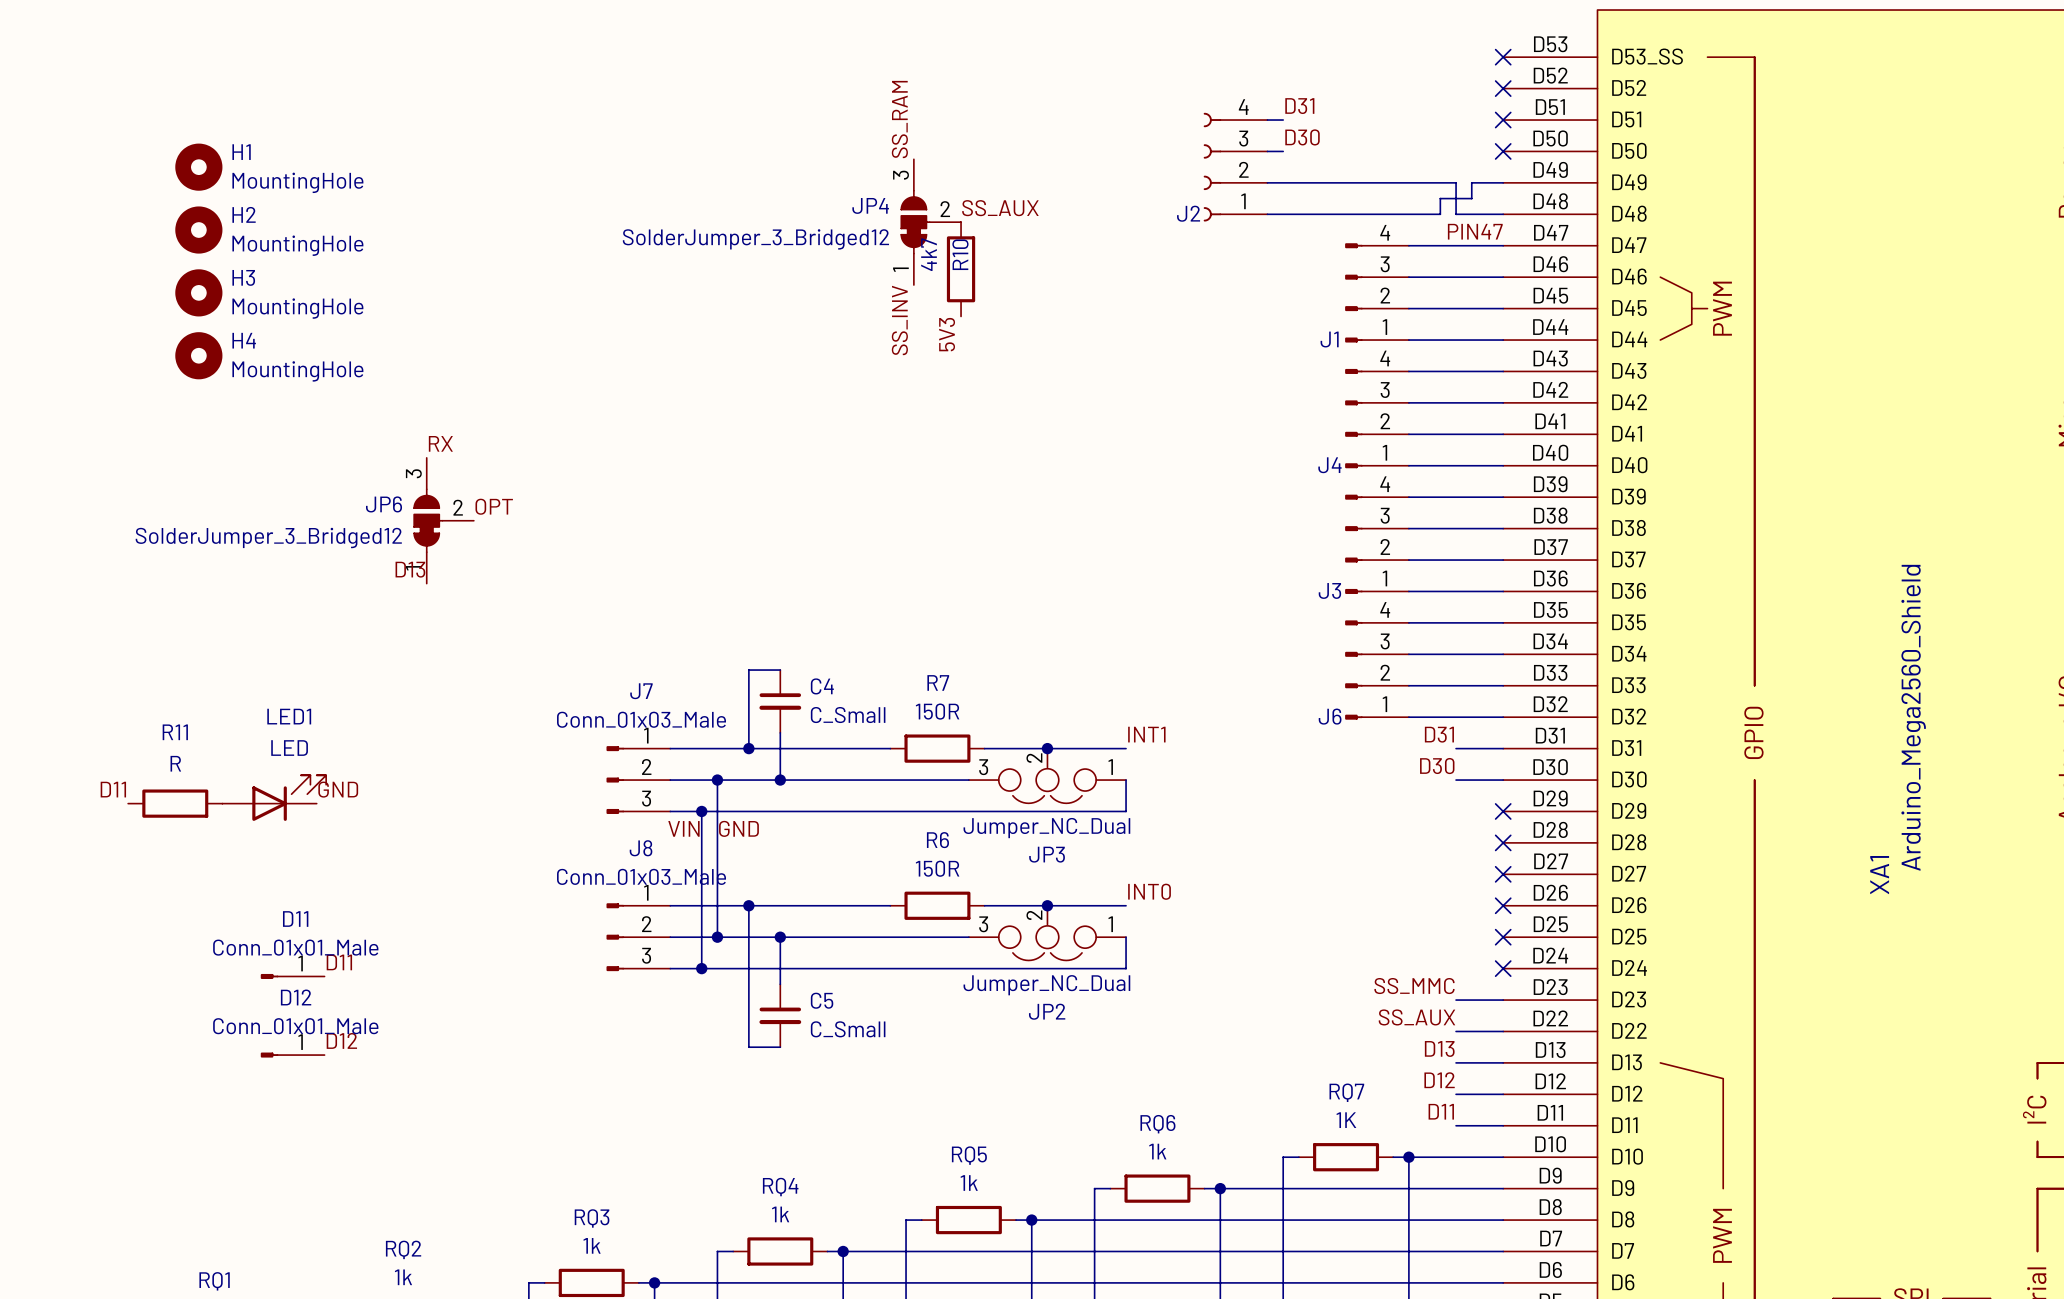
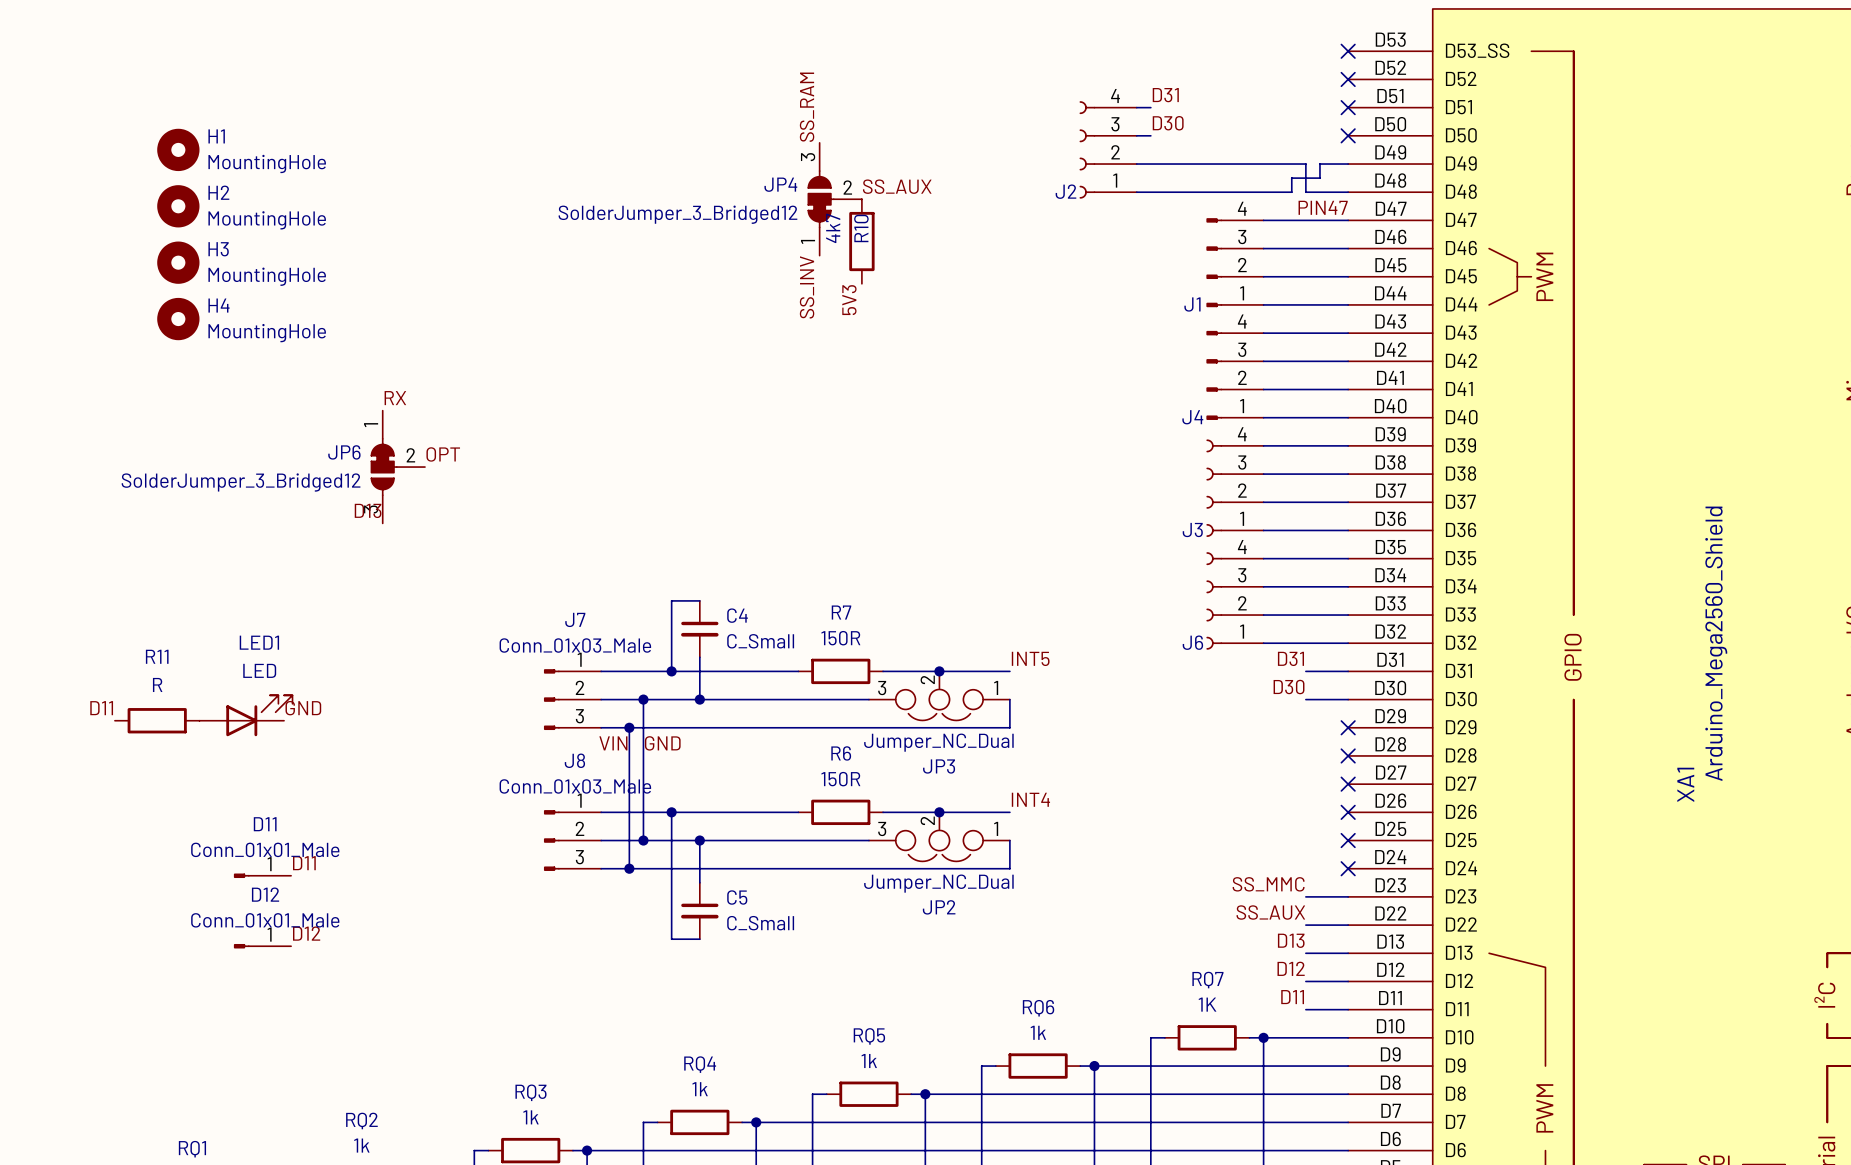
J3 symbol: [1345, 494, 1409, 594] -> [1206, 439, 1264, 537]
JP6 flip: as is (428, 520) -> up-down (384, 467)
J6 symbol: [1345, 620, 1409, 720] -> [1206, 552, 1264, 650]
label: INT1 (1146, 734) -> INT5 (1030, 658)
label: INT0 (1149, 891) -> INT4 (1030, 799)

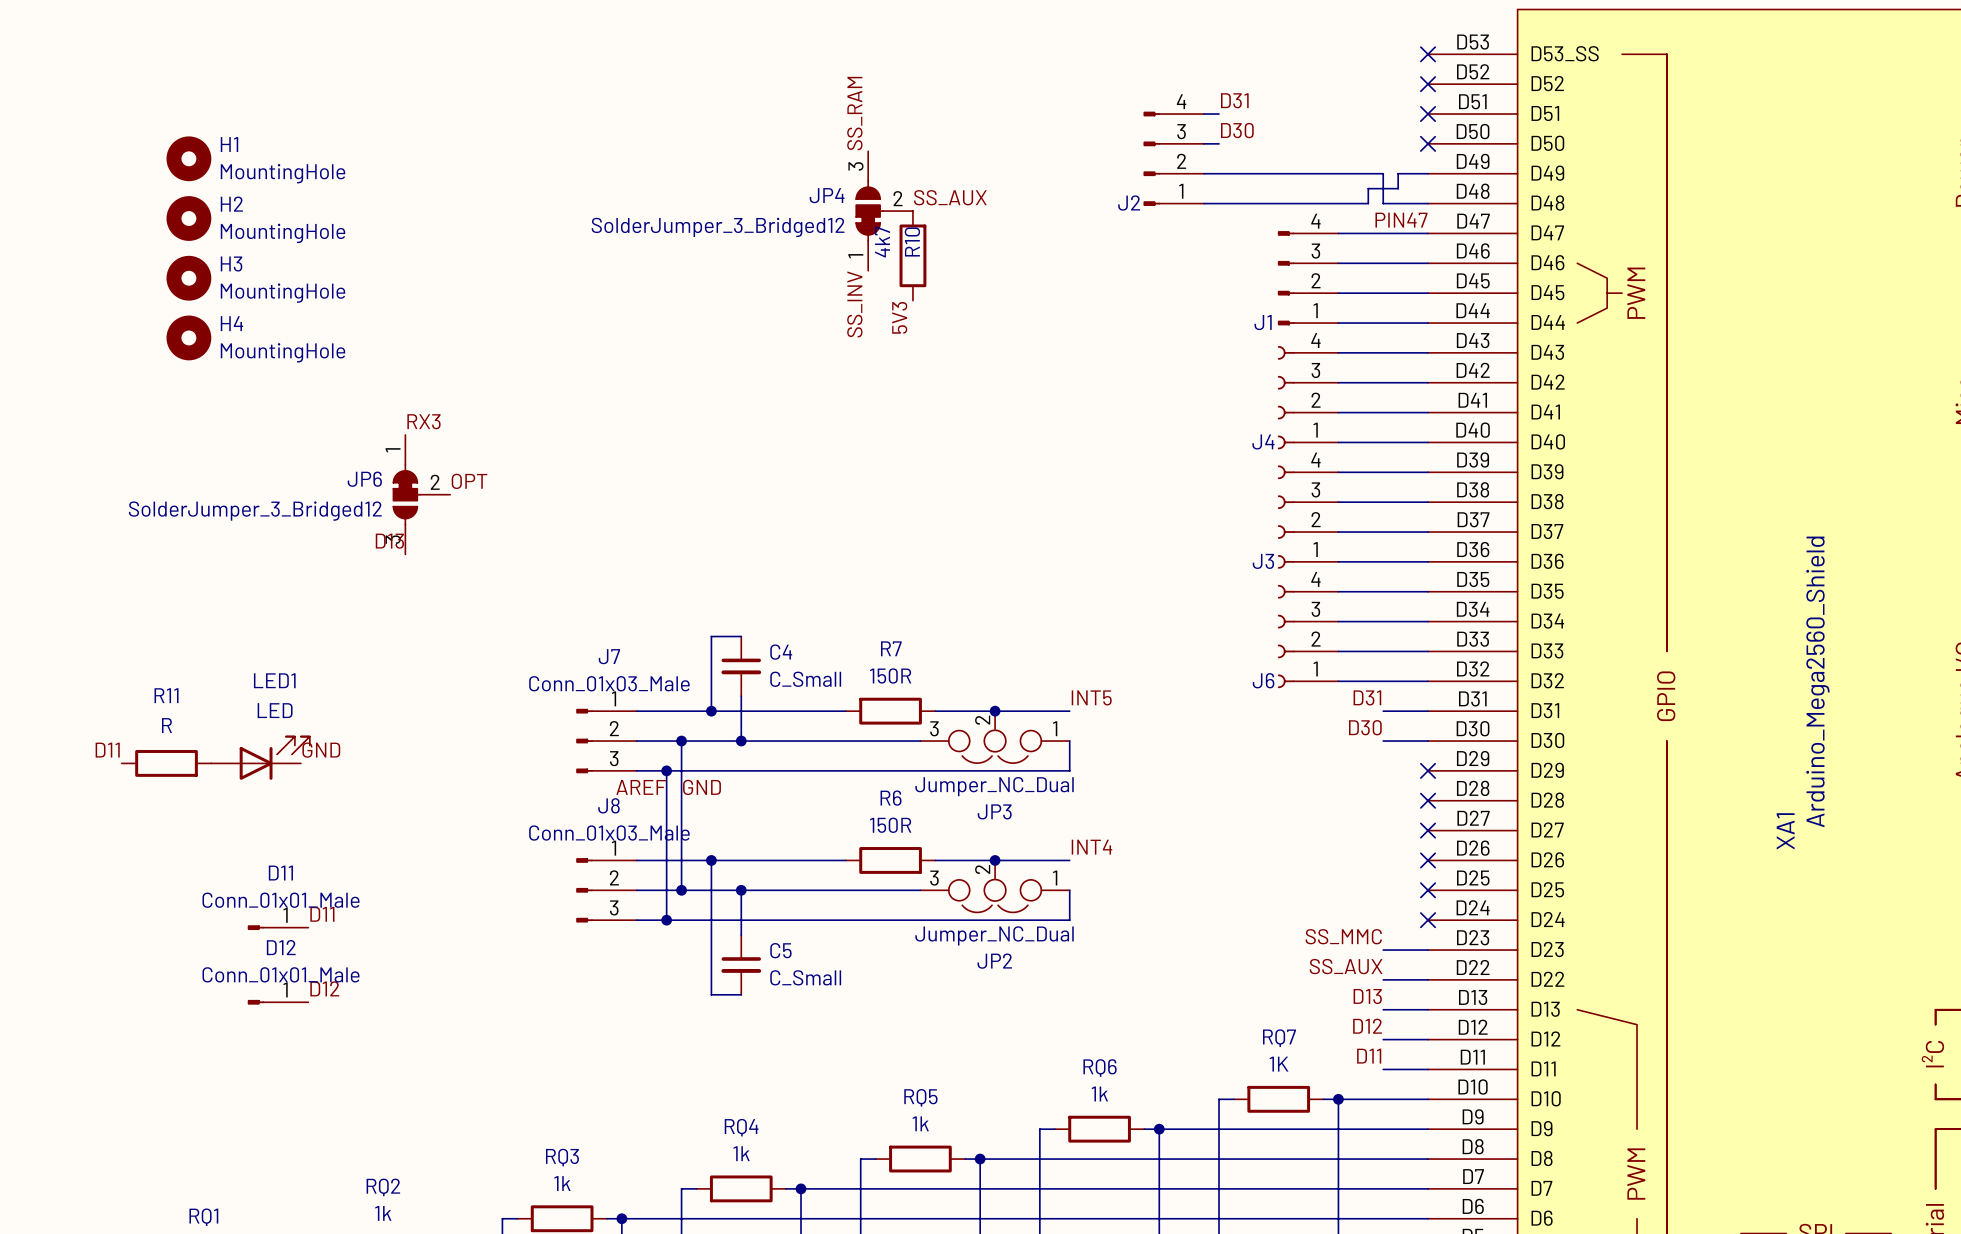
J2 symbol: [1079, 101, 1137, 199] -> [1143, 111, 1205, 206]
J4 symbol: [1206, 330, 1264, 420] -> [1277, 346, 1339, 450]
label: RX (395, 398) -> RX3 (423, 421)
label: VIN (613, 743) -> AREF (641, 787)

